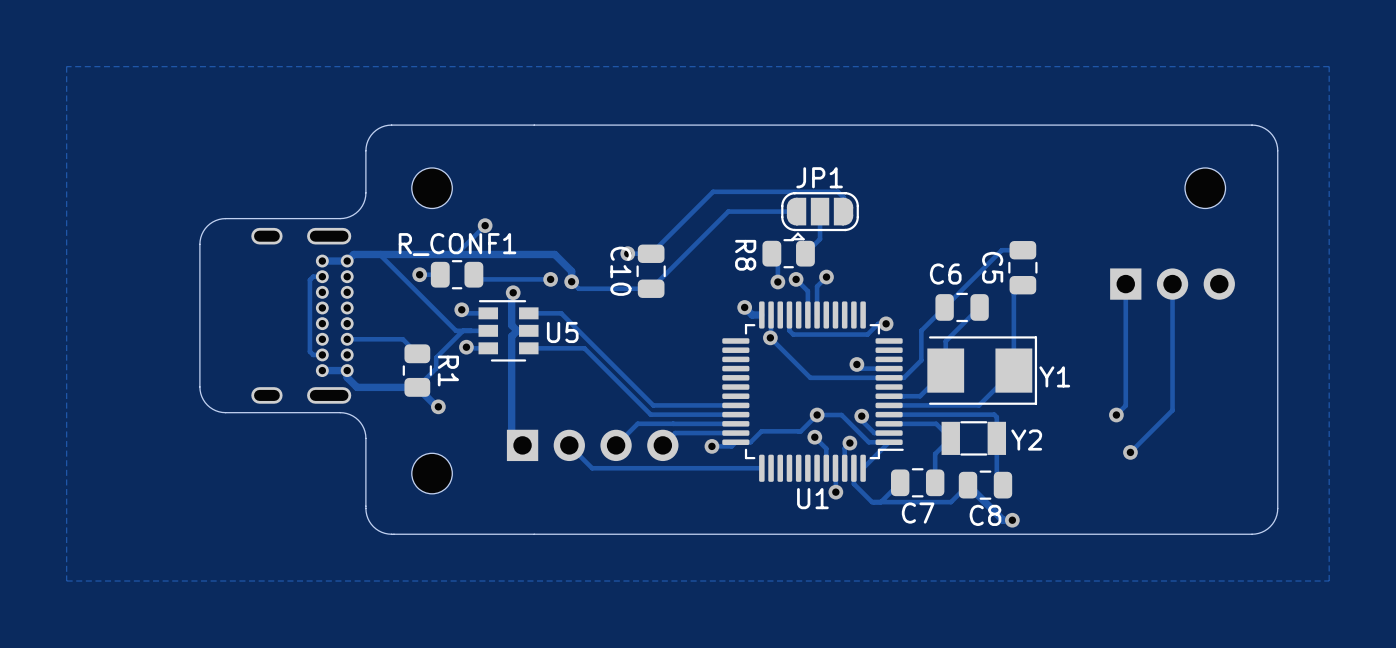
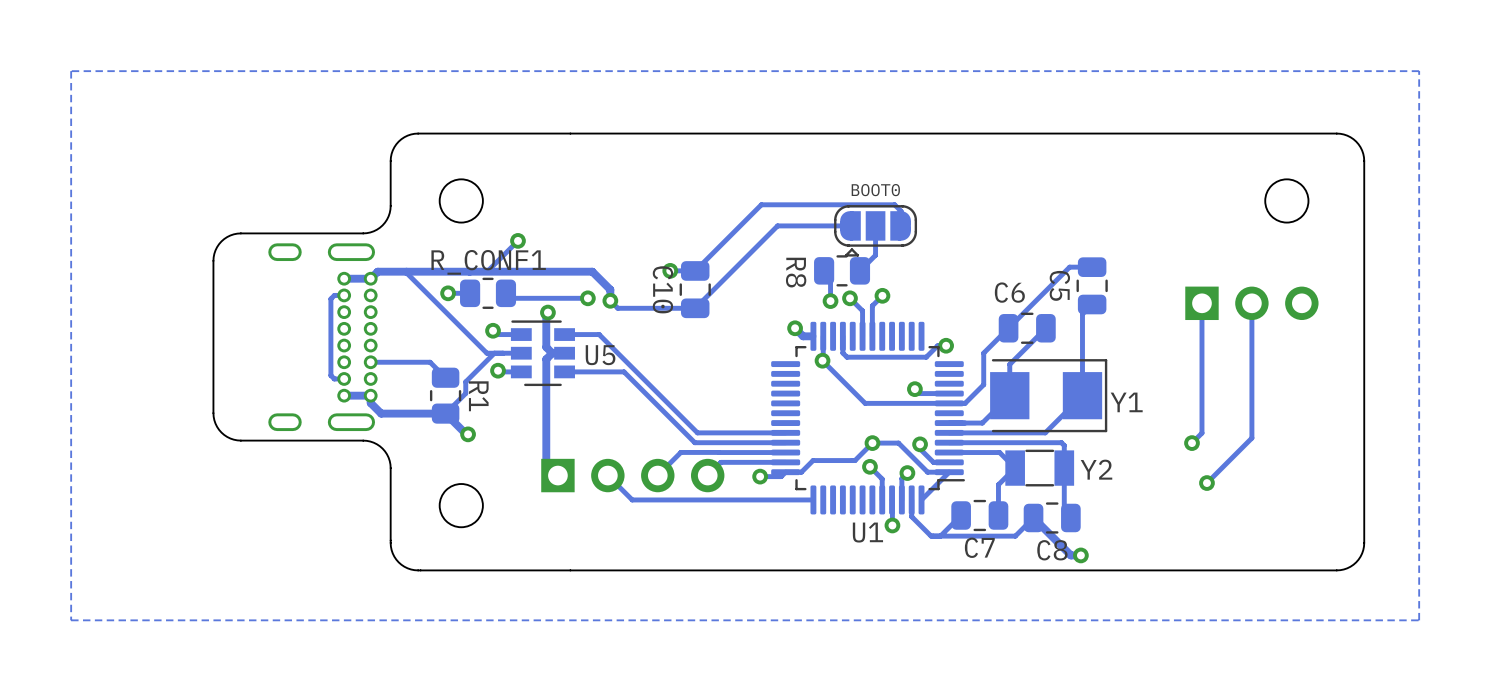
JP1 name: JP1 (819, 177) -> BOOT0 (875, 190)

